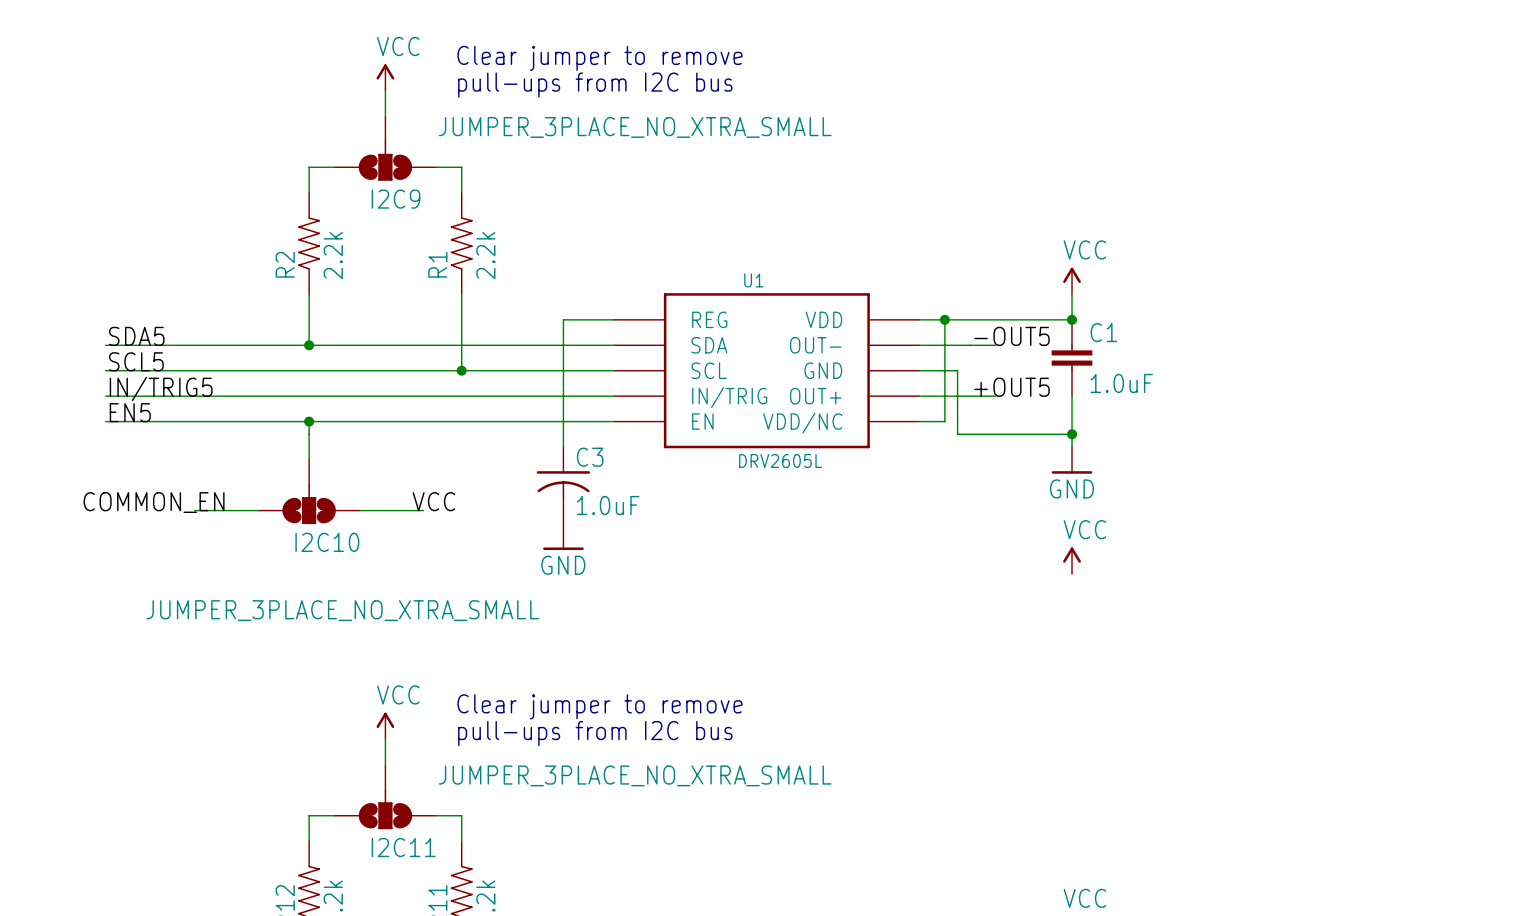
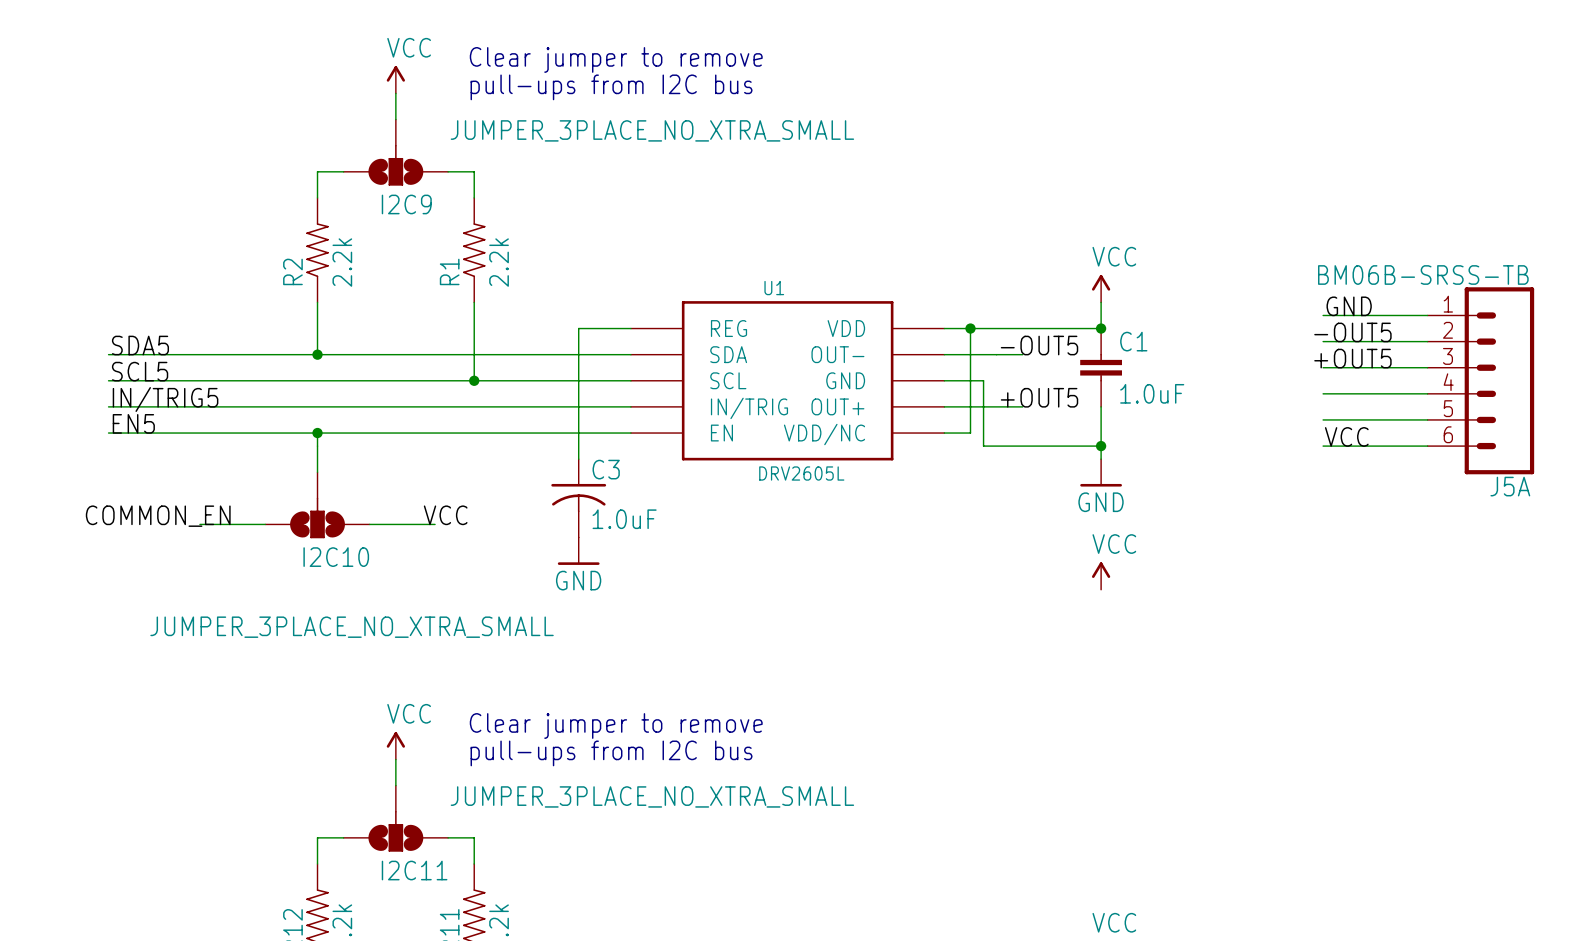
label: none -> GND (1349, 306)
wire: none -> (1323, 315) (1427, 315)
label: none -> -OUT5 (1352, 332)
wire: none -> (1323, 341) (1427, 341)
label: none -> +OUT5 (1352, 358)
wire: none -> (1323, 367) (1427, 367)
J5A: none -> BM06B-SRSS-TB (1480, 380)
wire: none -> (1323, 393) (1427, 393)
wire: none -> (1323, 419) (1427, 419)
label: none -> VCC (1346, 436)
wire: none -> (1323, 446) (1427, 446)

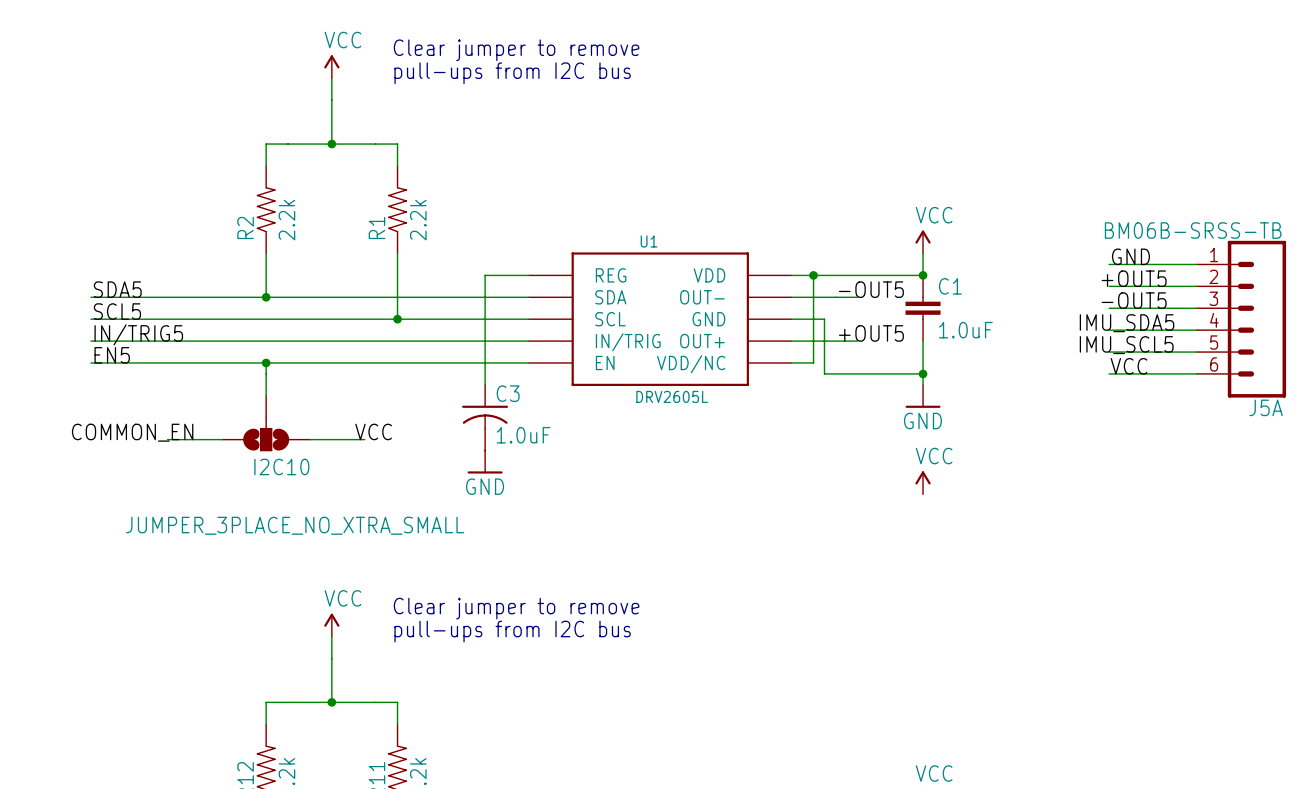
I2C9: JUMPER_3PLACE_NO_XTRA_SMALL (395, 152) -> none
junction: none -> (331, 144)
label: -OUT5 (1352, 332) -> +OUT5 (1134, 278)
label: +OUT5 (1352, 358) -> -OUT5 (1134, 300)
label: none -> IMU_SDA5 (1127, 323)
label: none -> IMU_SCL5 (1126, 345)
I2C11: JUMPER_3PLACE_NO_XTRA_SMALL (395, 818) -> none
junction: none -> (331, 702)

